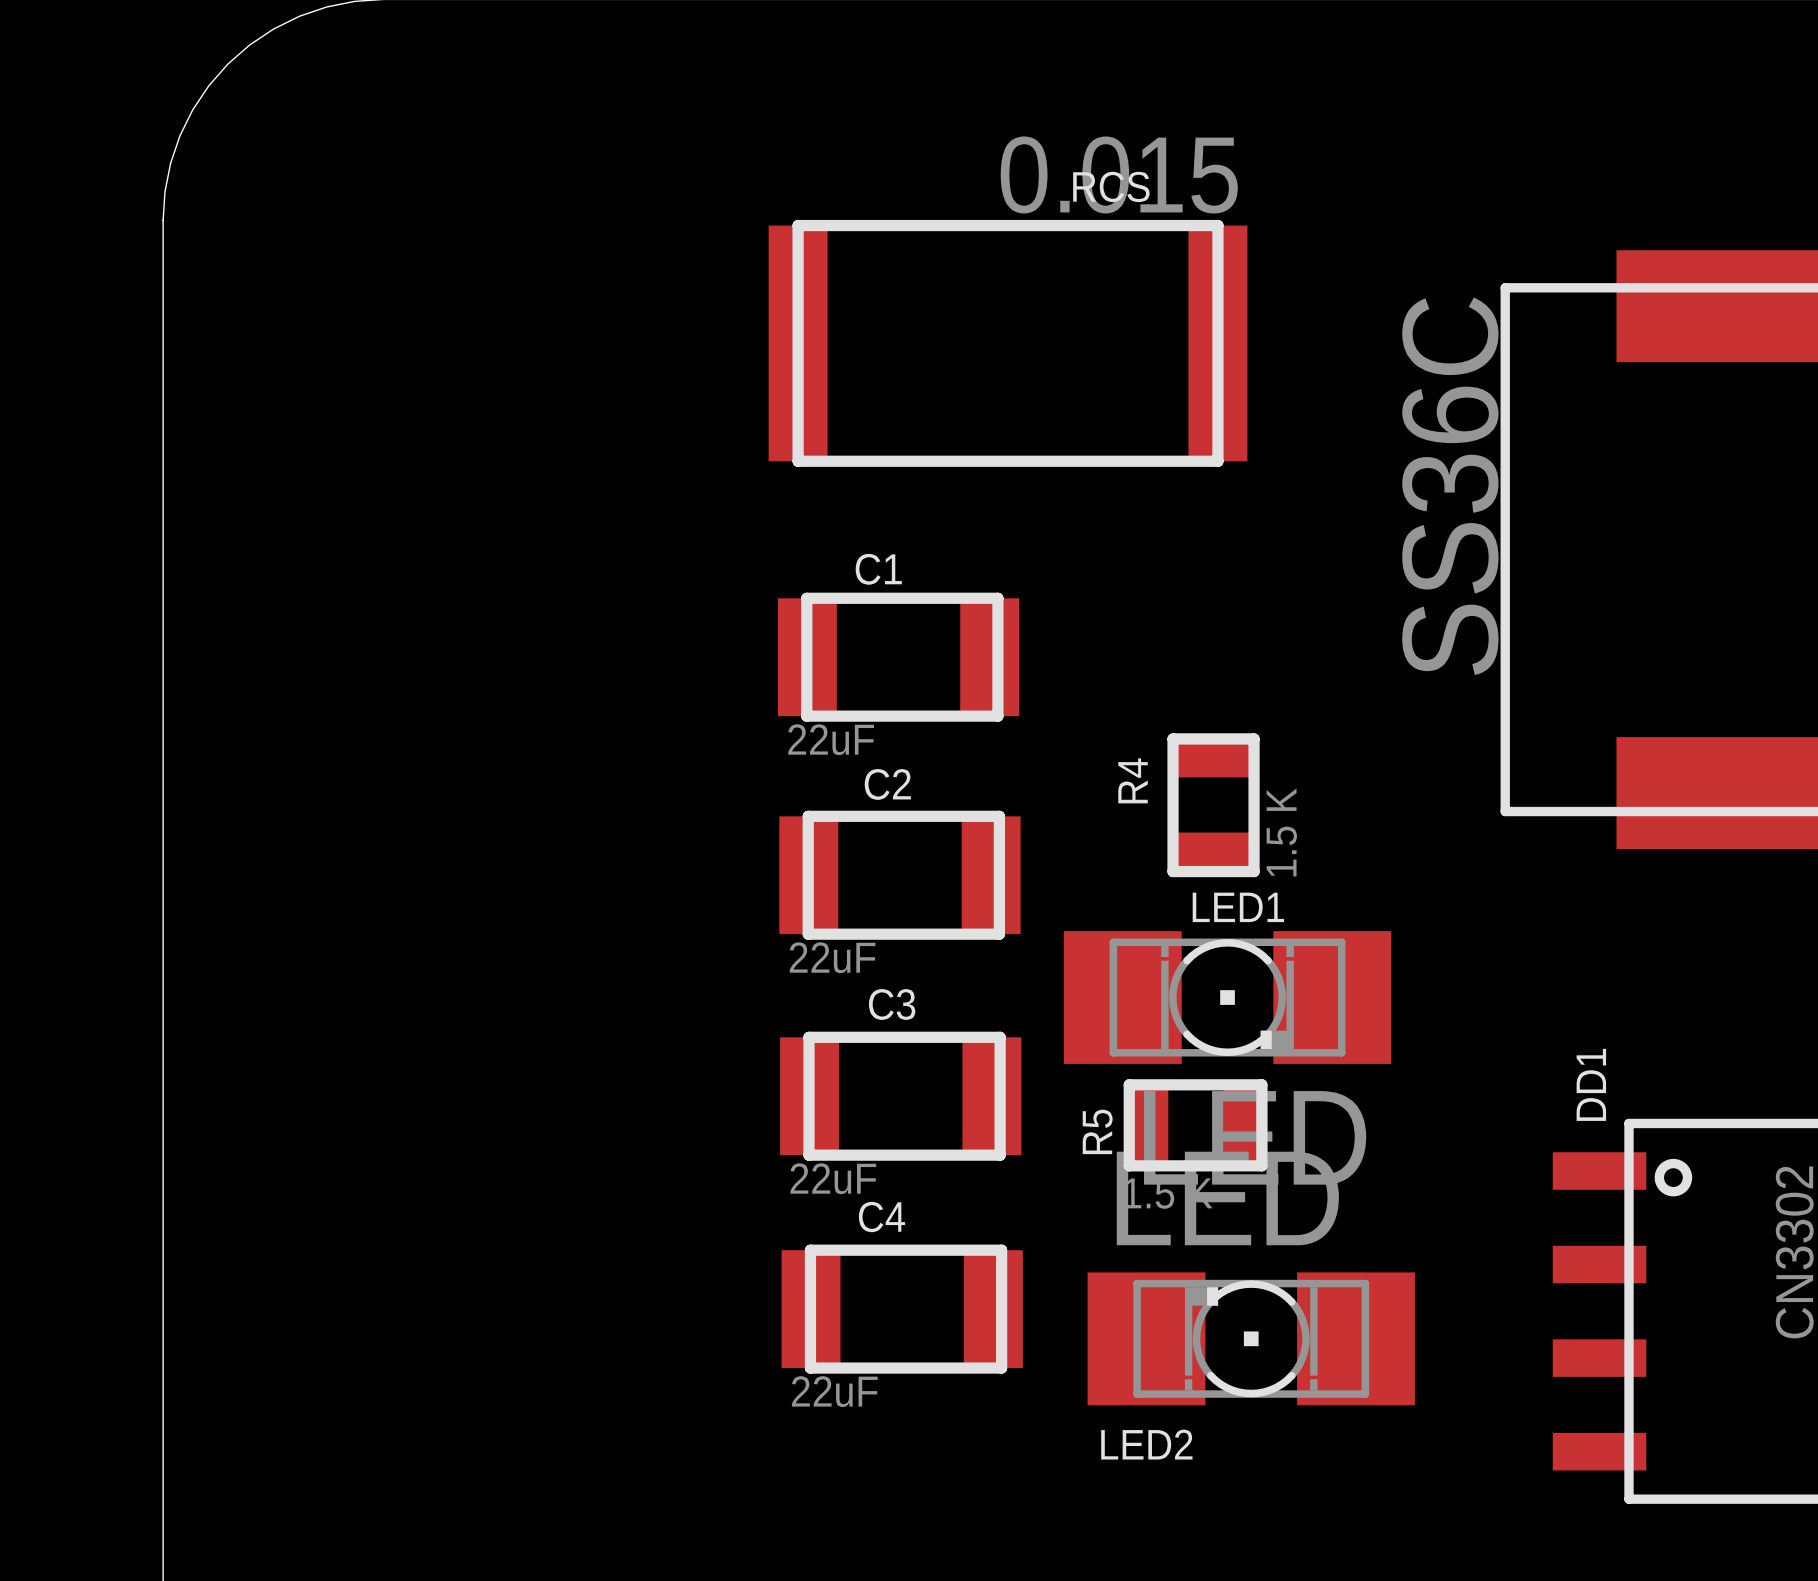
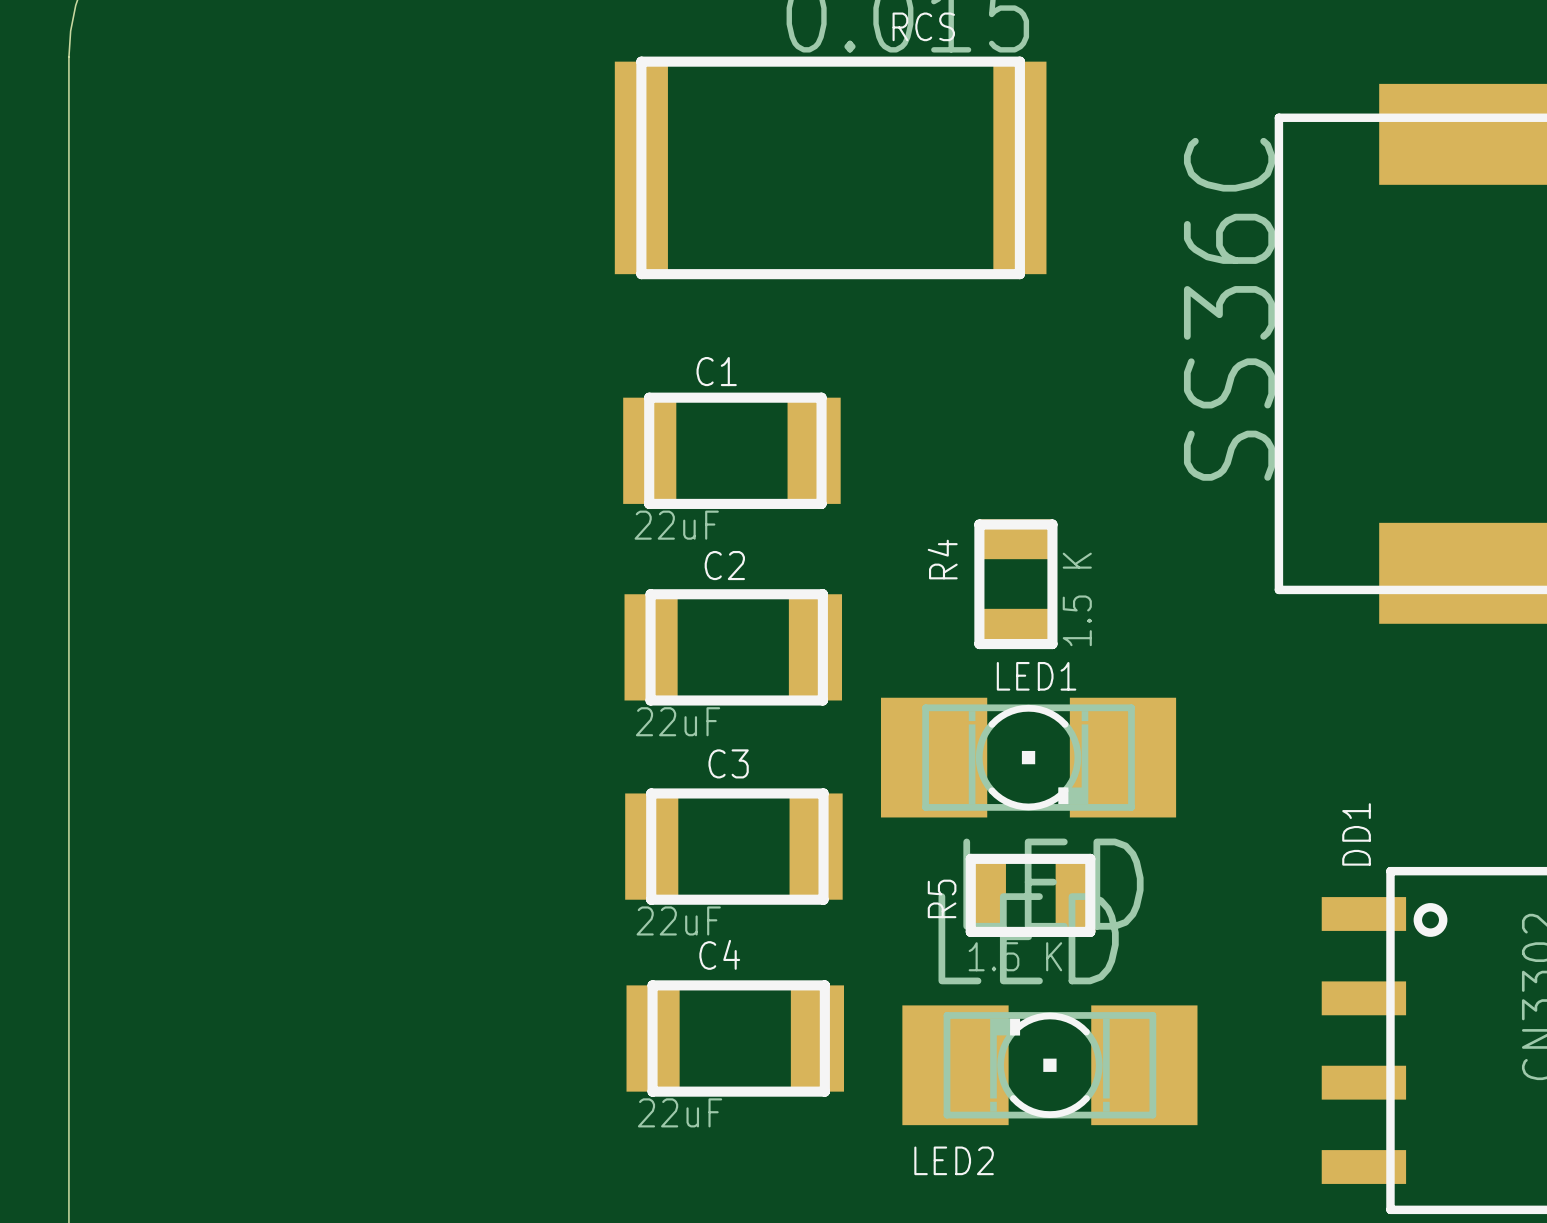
R5 position: (1195, 1125) -> (1030, 895)

